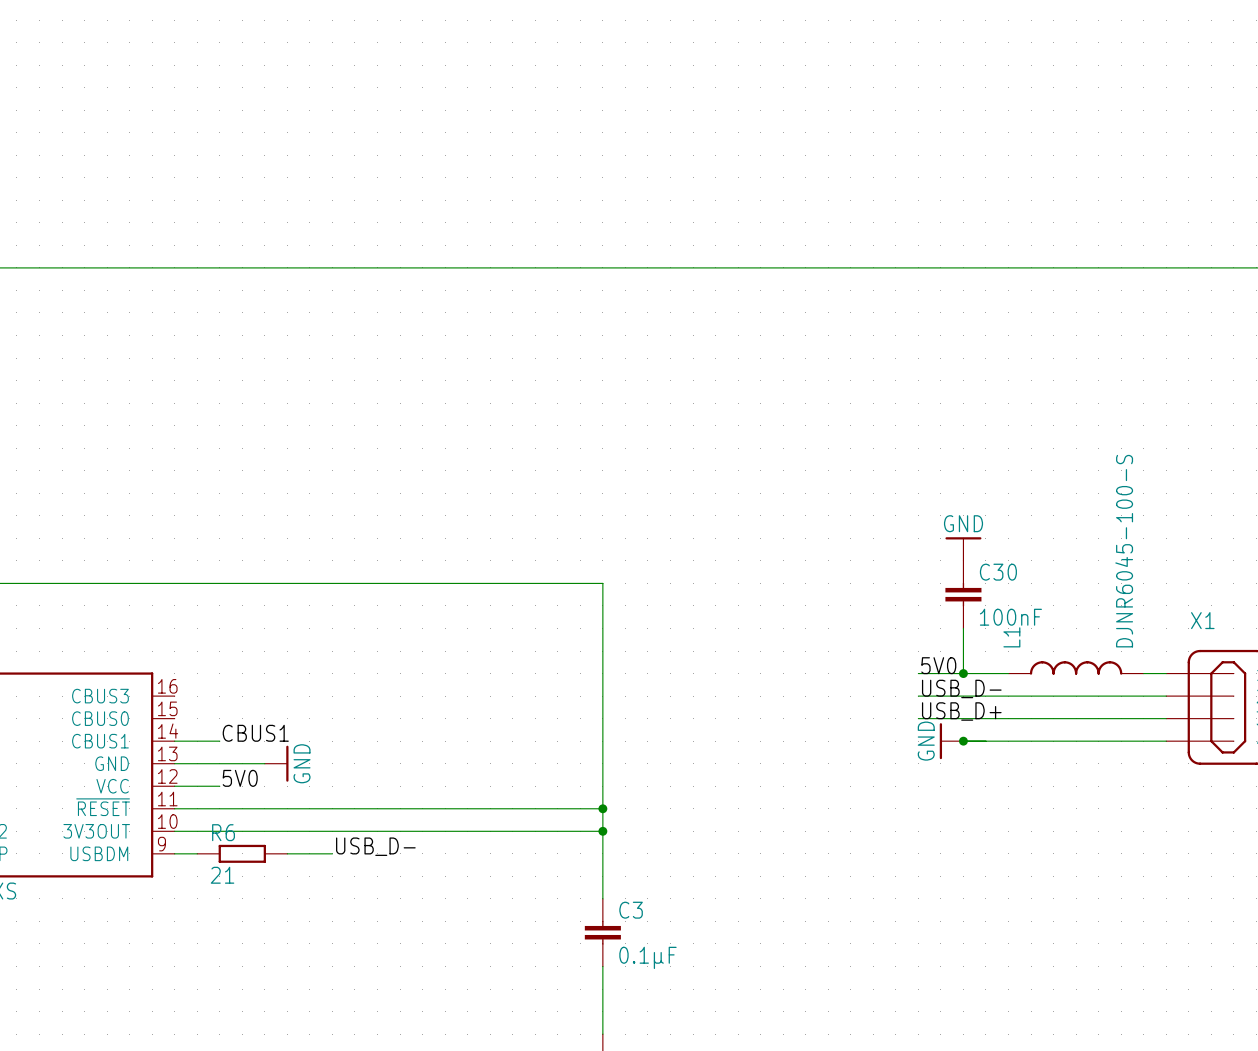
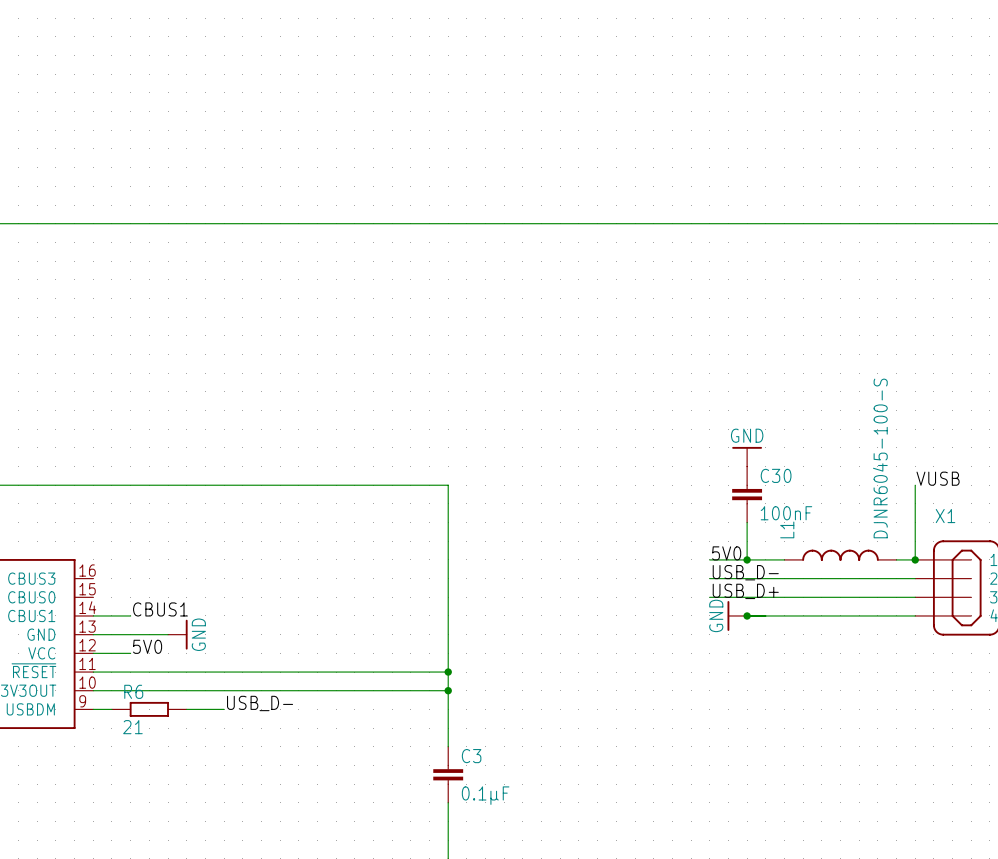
label: none -> VUSB (938, 478)
wire: none -> (915, 485) (915, 559)
junction: none -> (915, 559)

